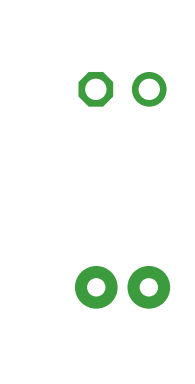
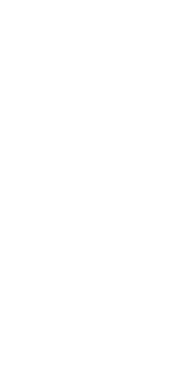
part: (122, 89) -> none
part: (122, 287) -> none

